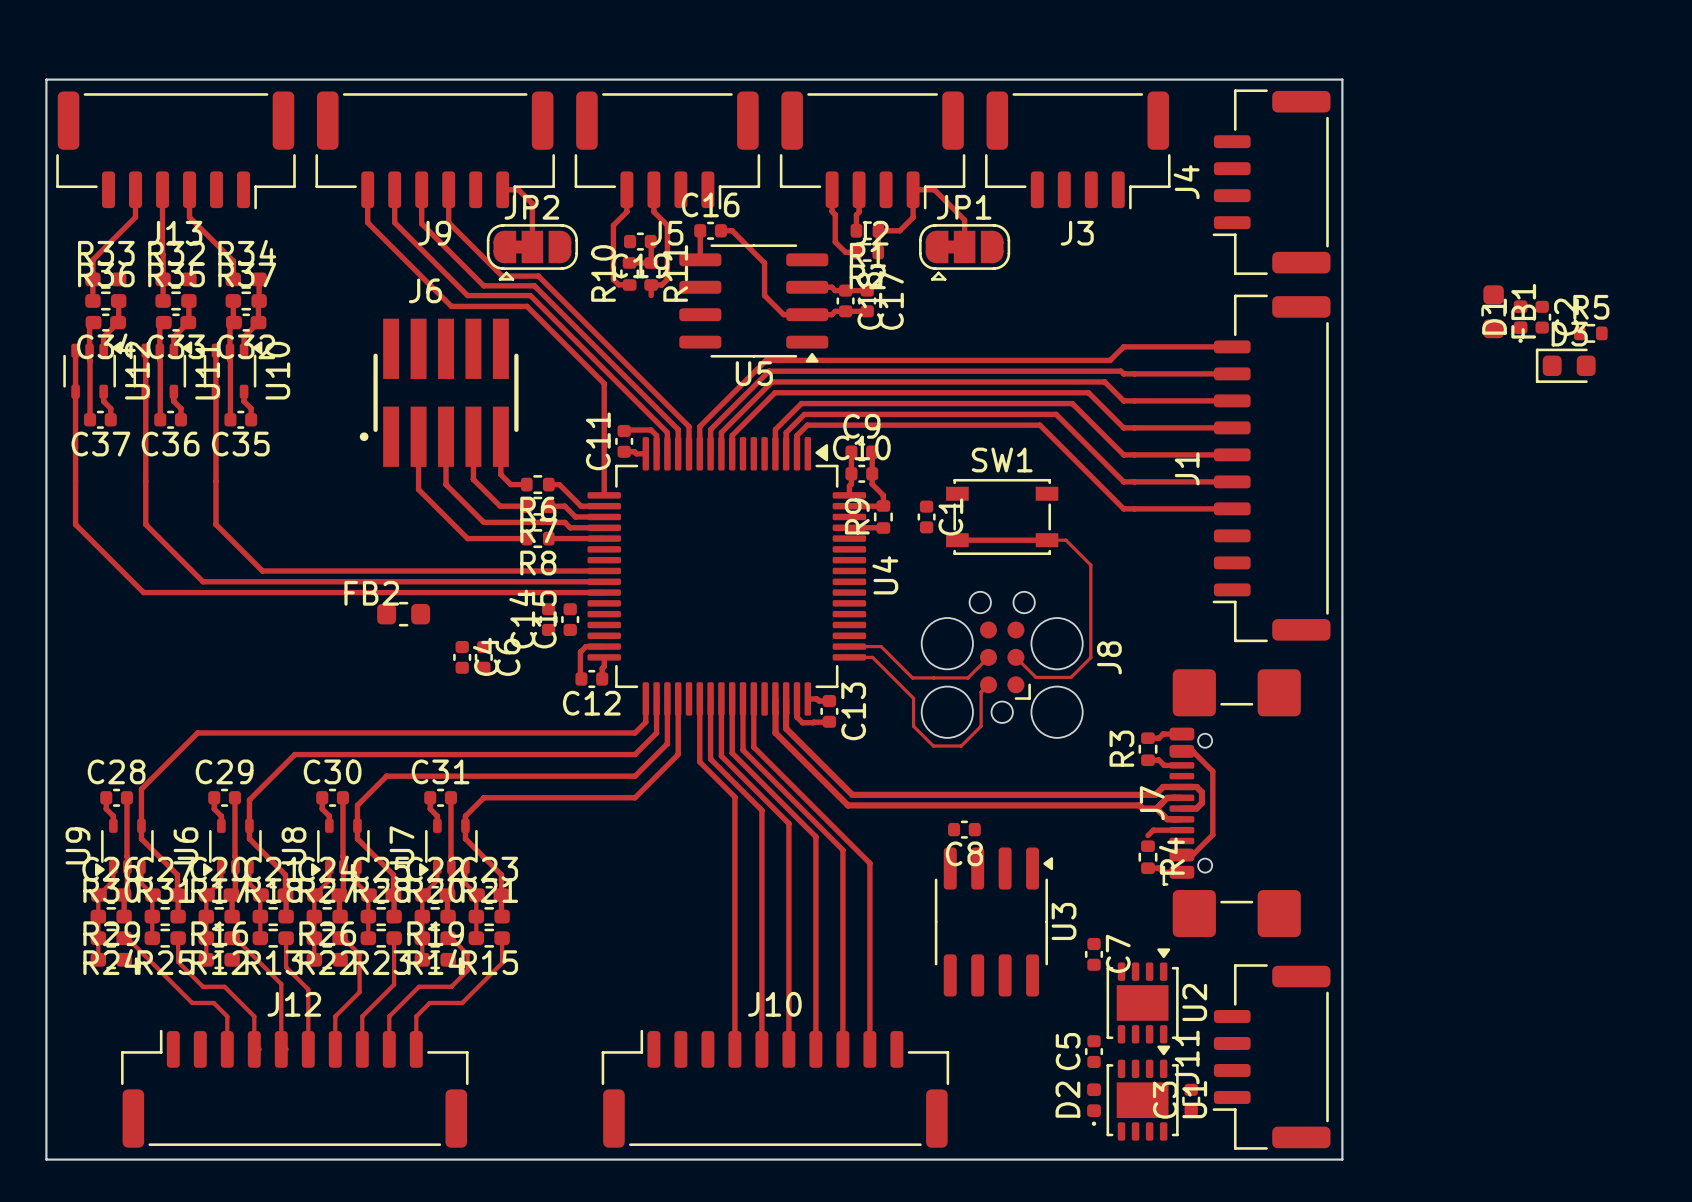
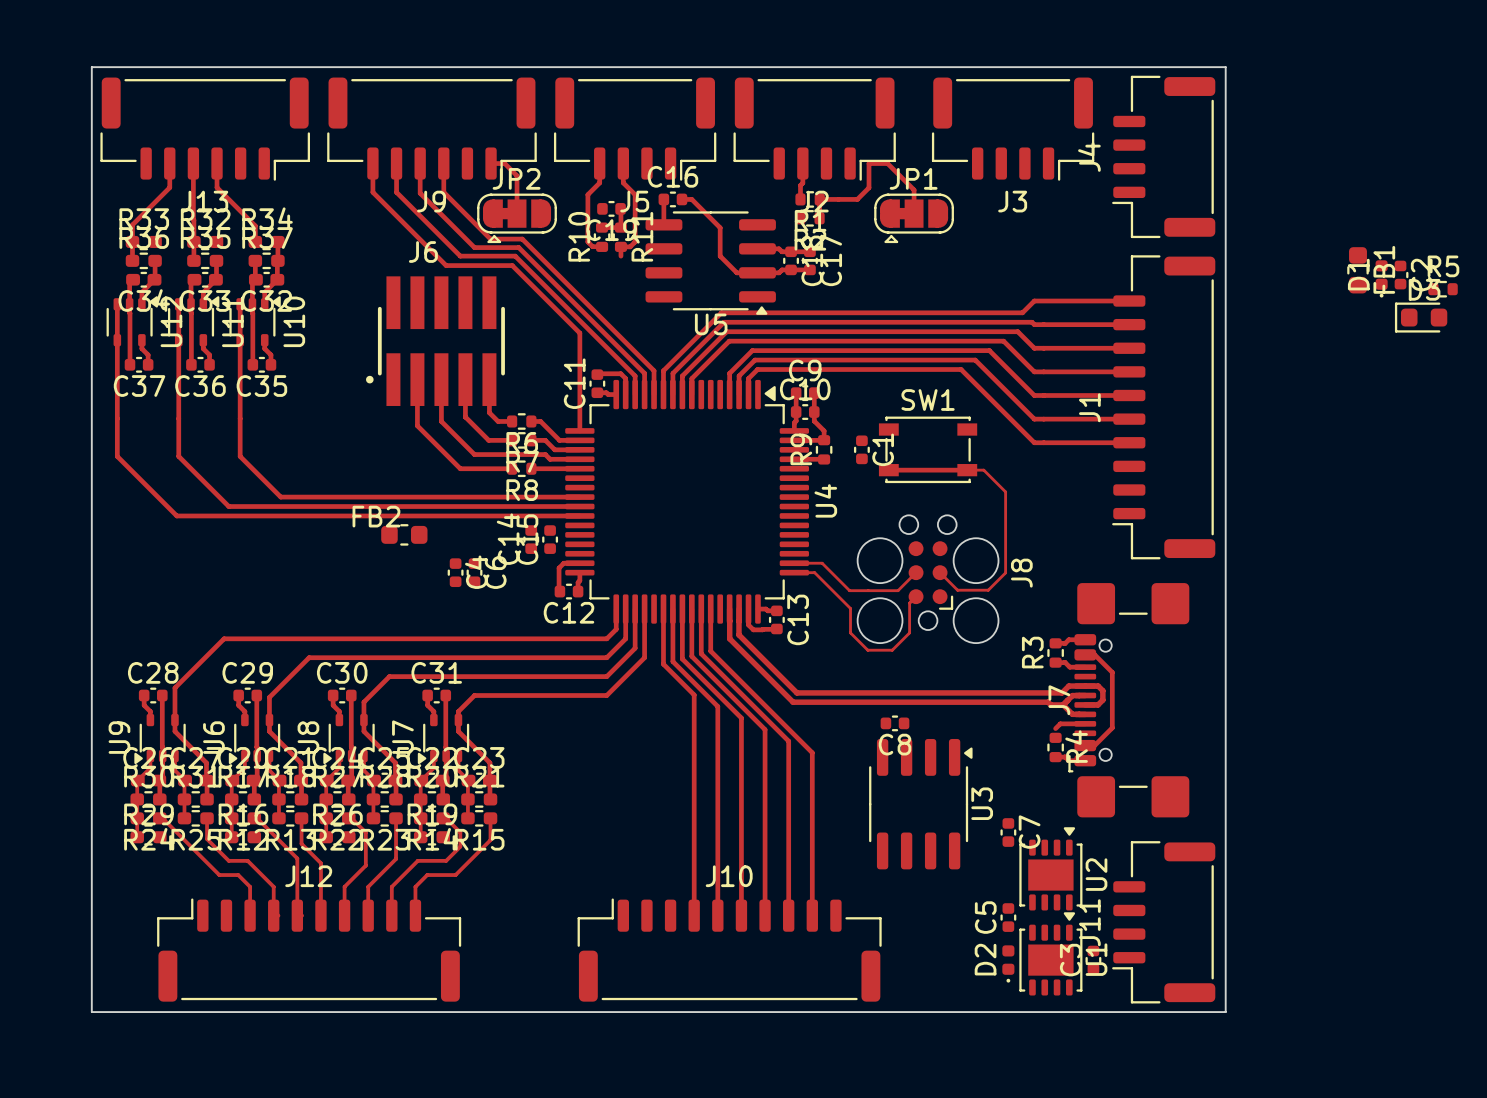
J3 position: (1077, 150) -> (1013, 129)
top track: (832, 189) (832, 211) (835, 214) (835, 242) (845, 252) (856, 252) -> none
top track: (899, 230) (913, 217) (913, 189) (934, 189) (964, 219) (964, 246) -> (838, 199) (857, 199) (869, 187) (869, 163) (887, 163) (914, 189) (914, 213)
JP1 position: (964, 252) -> (914, 218)

